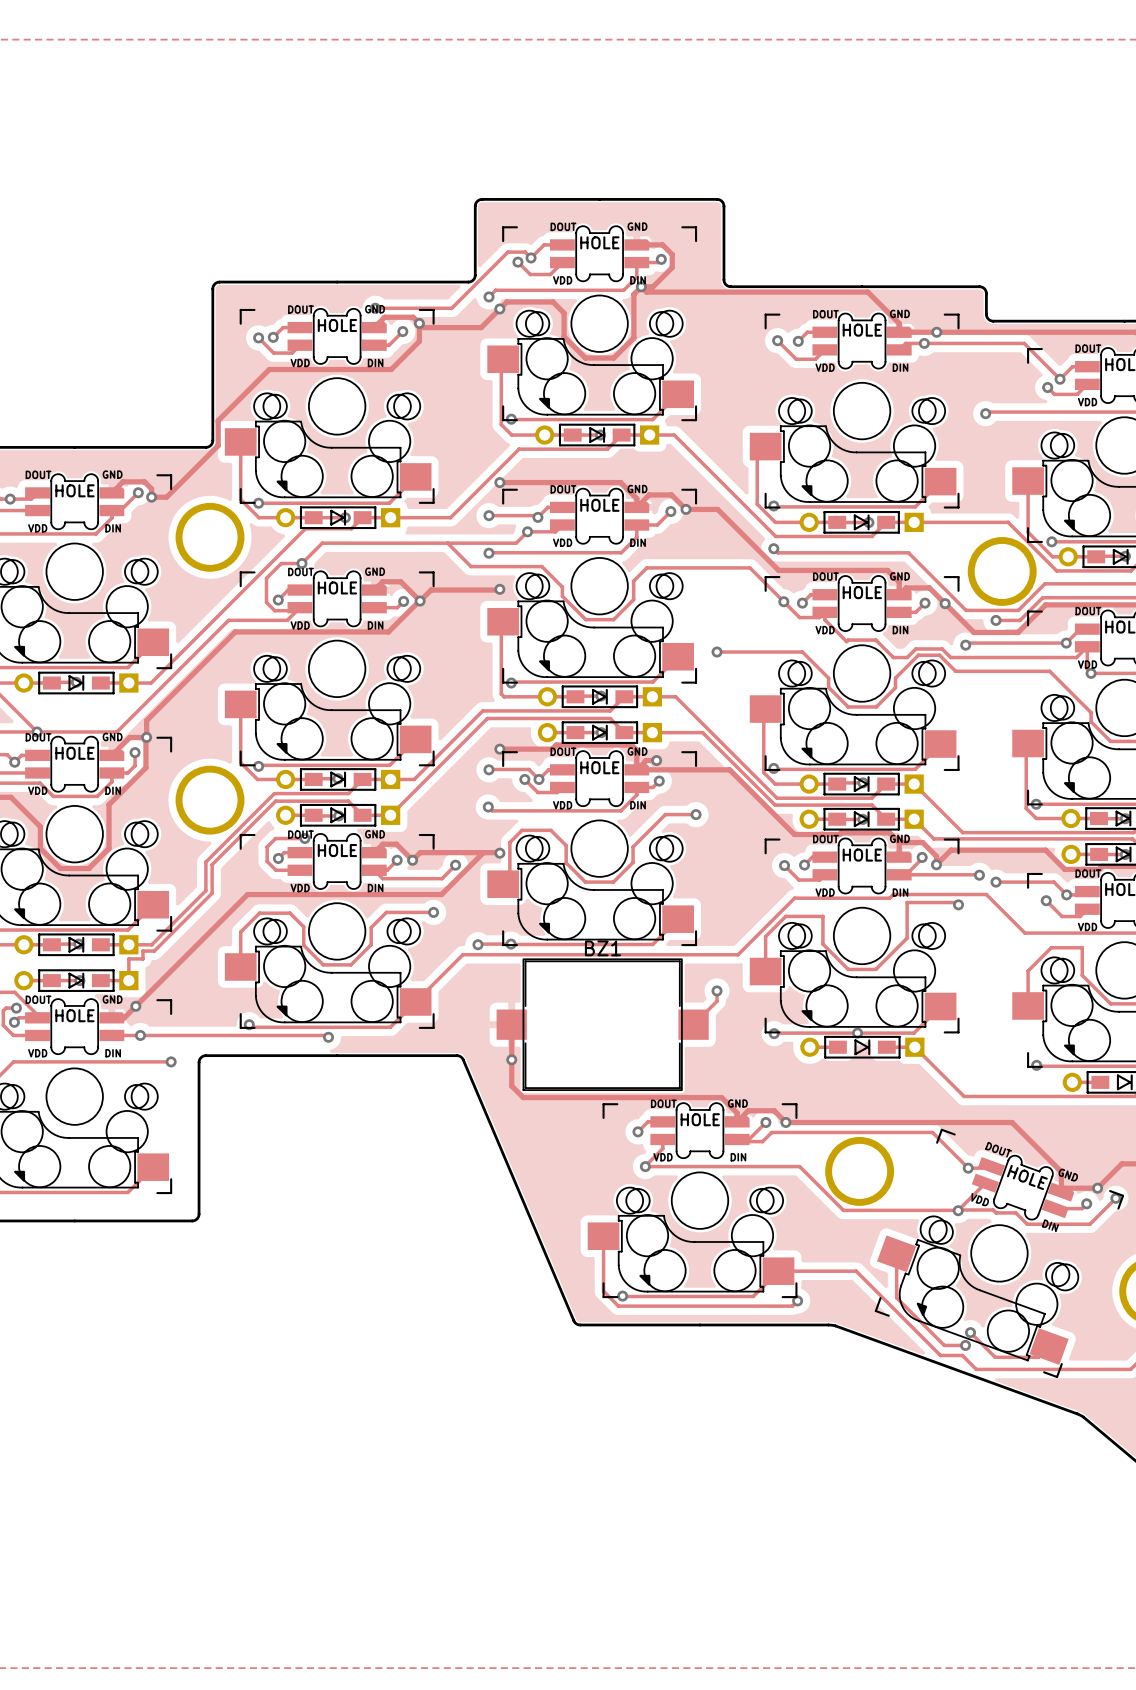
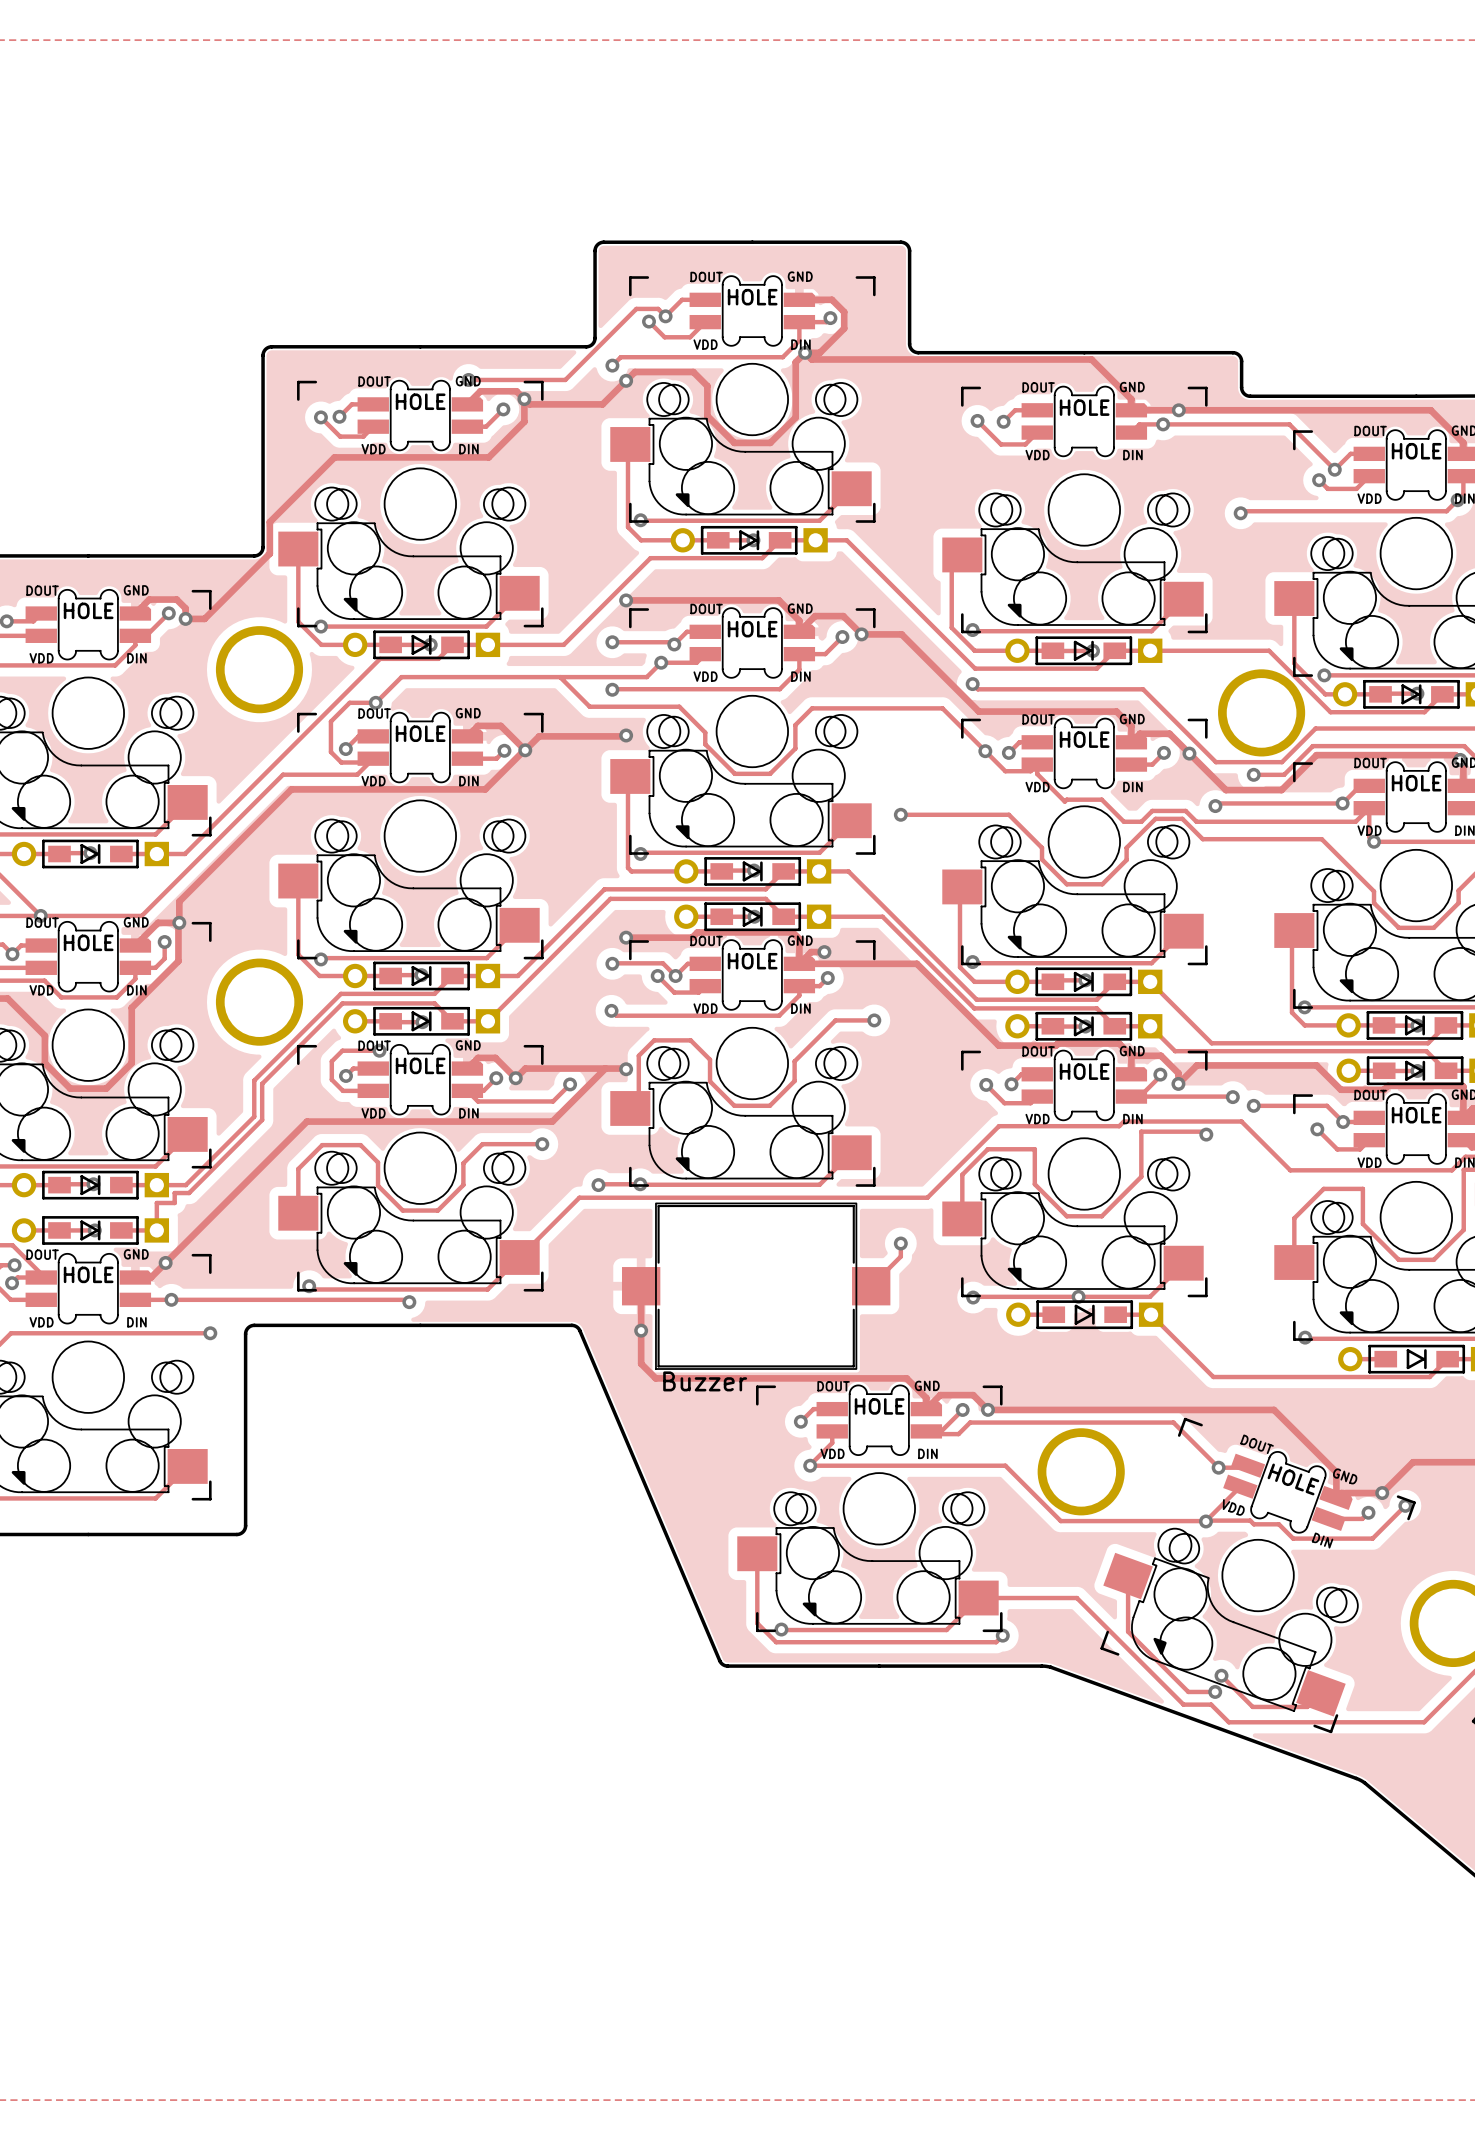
BZ1 name: BZ1 (602, 948) -> none
BZ1 value: none -> Buzzer (705, 1381)

